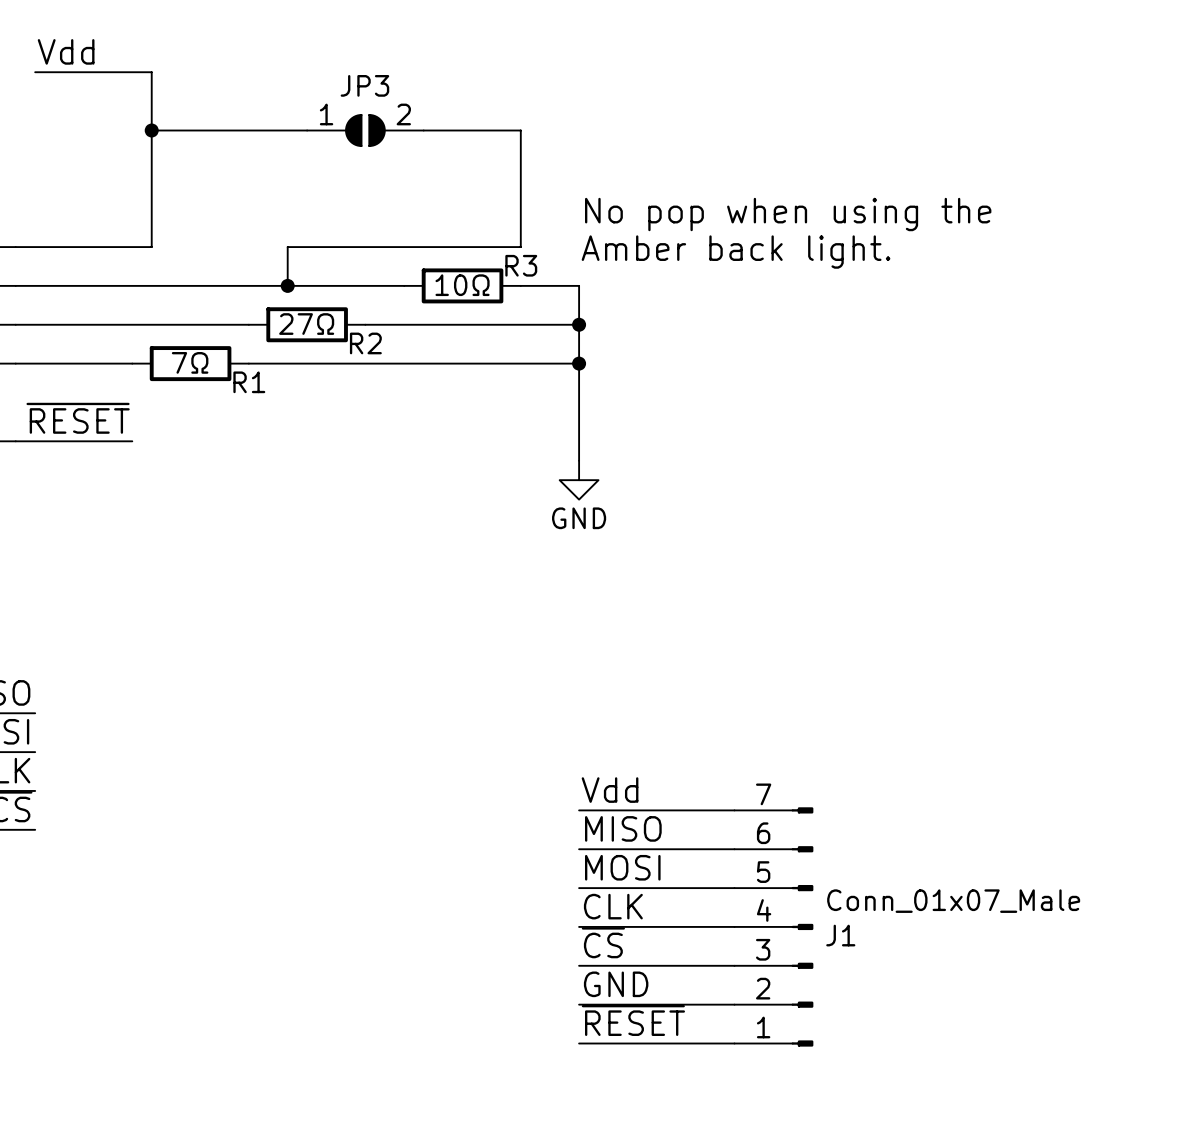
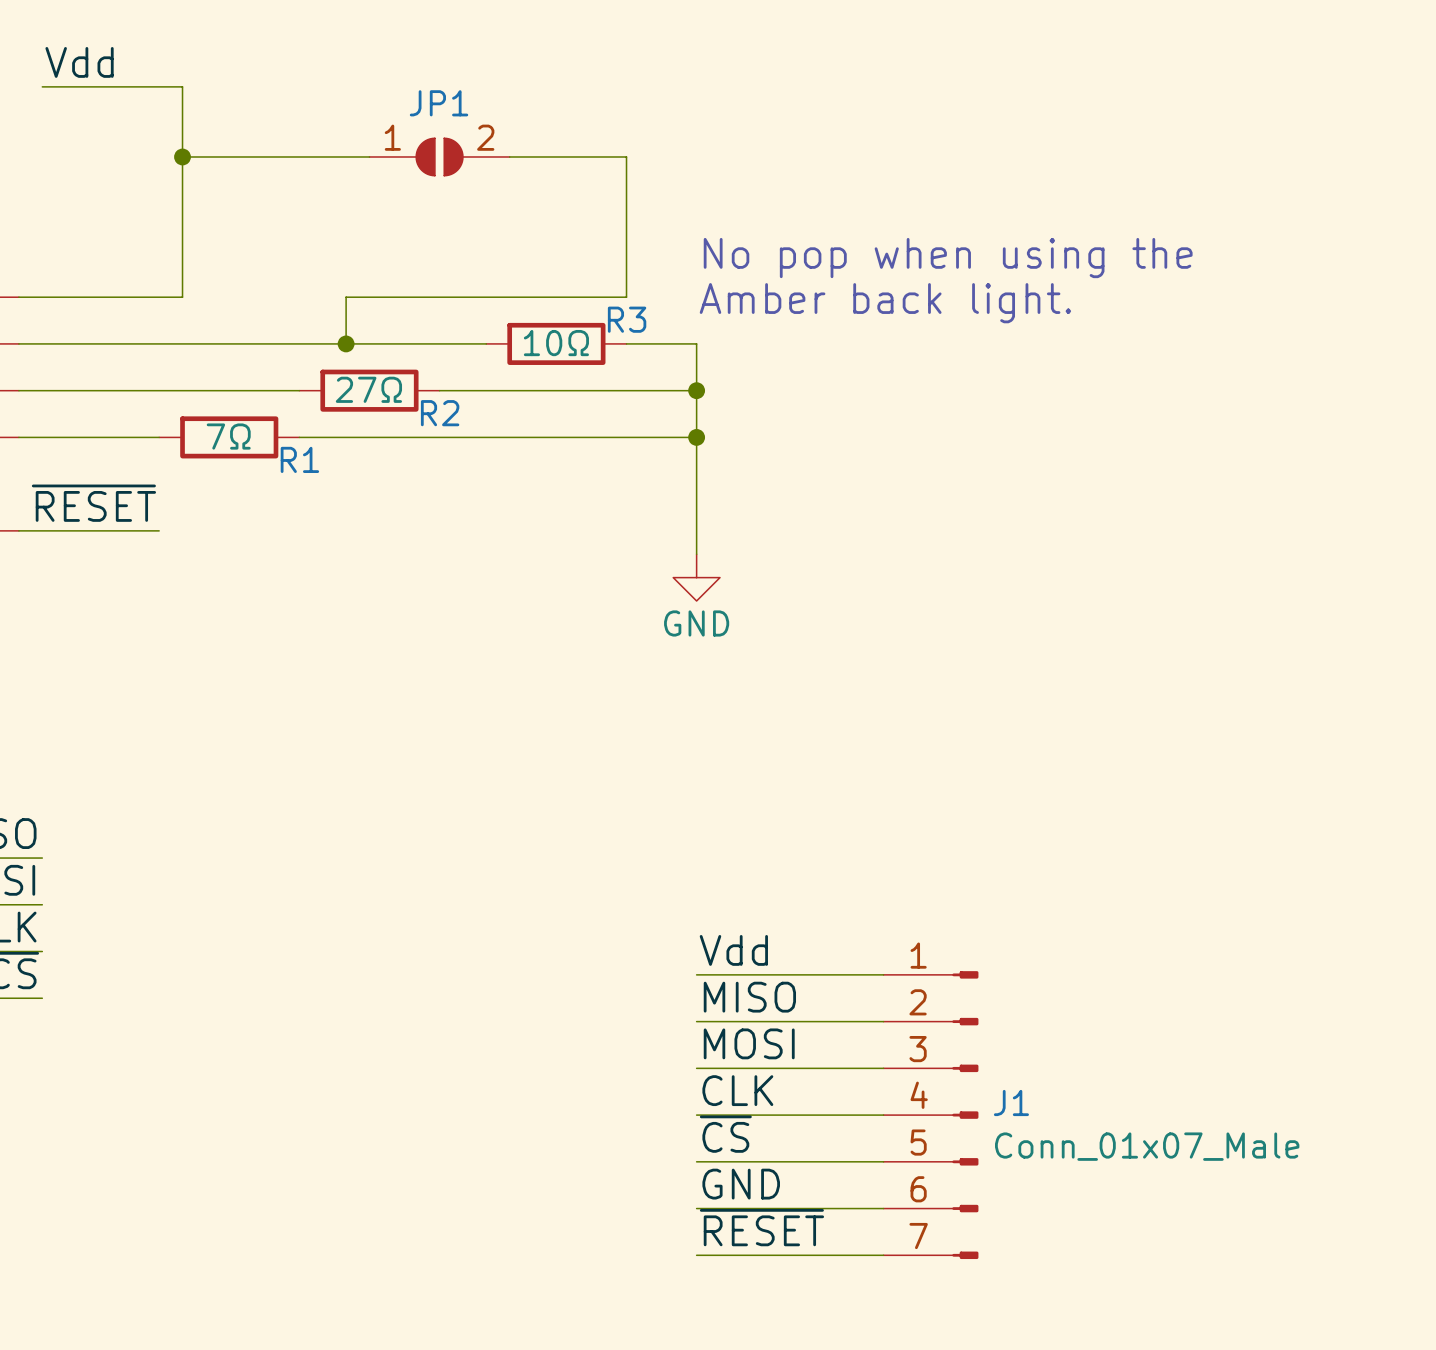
JP3 name: JP3 (364, 85) -> JP1 (439, 103)
J1 flip: as is (802, 926) -> up-down (965, 1115)

